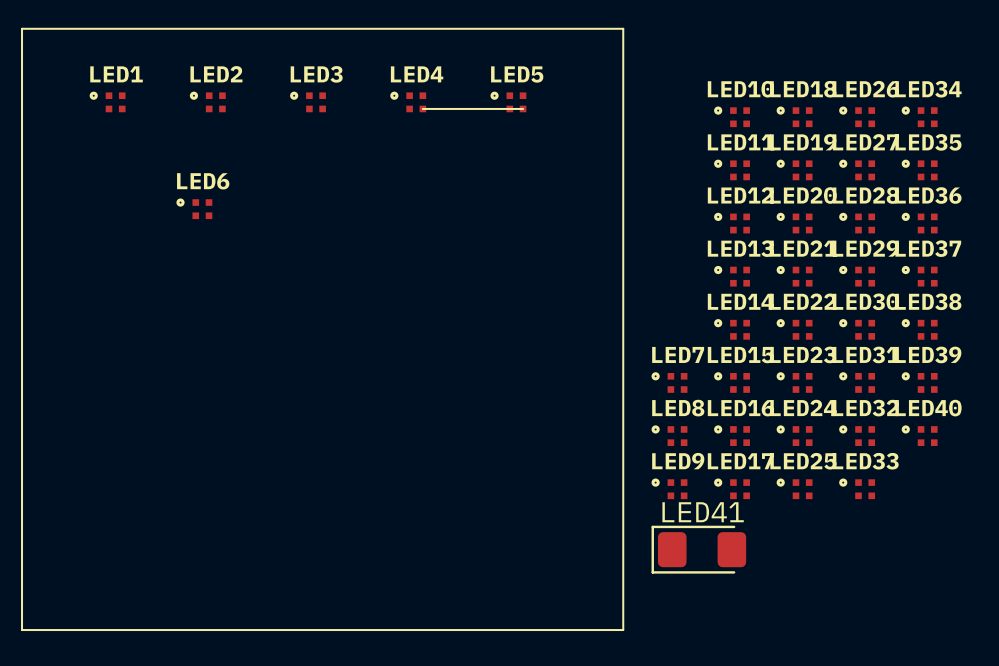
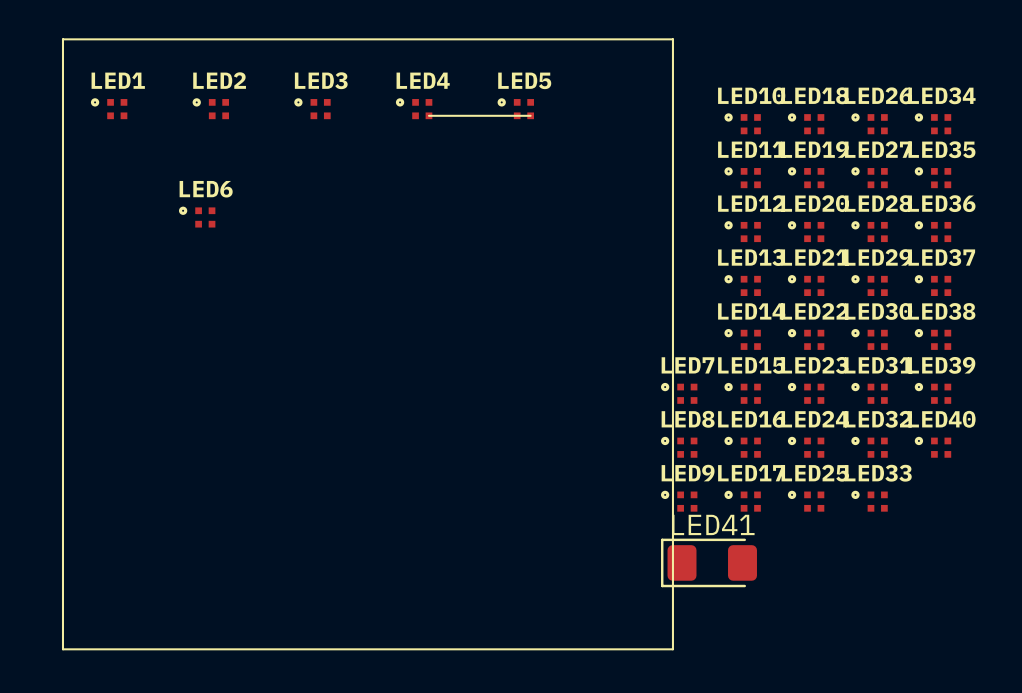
line: (22, 28) (623, 28) (623, 630) (22, 630) (22, 28) -> (62, 39) (672, 39) (672, 649) (62, 649) (62, 39)

